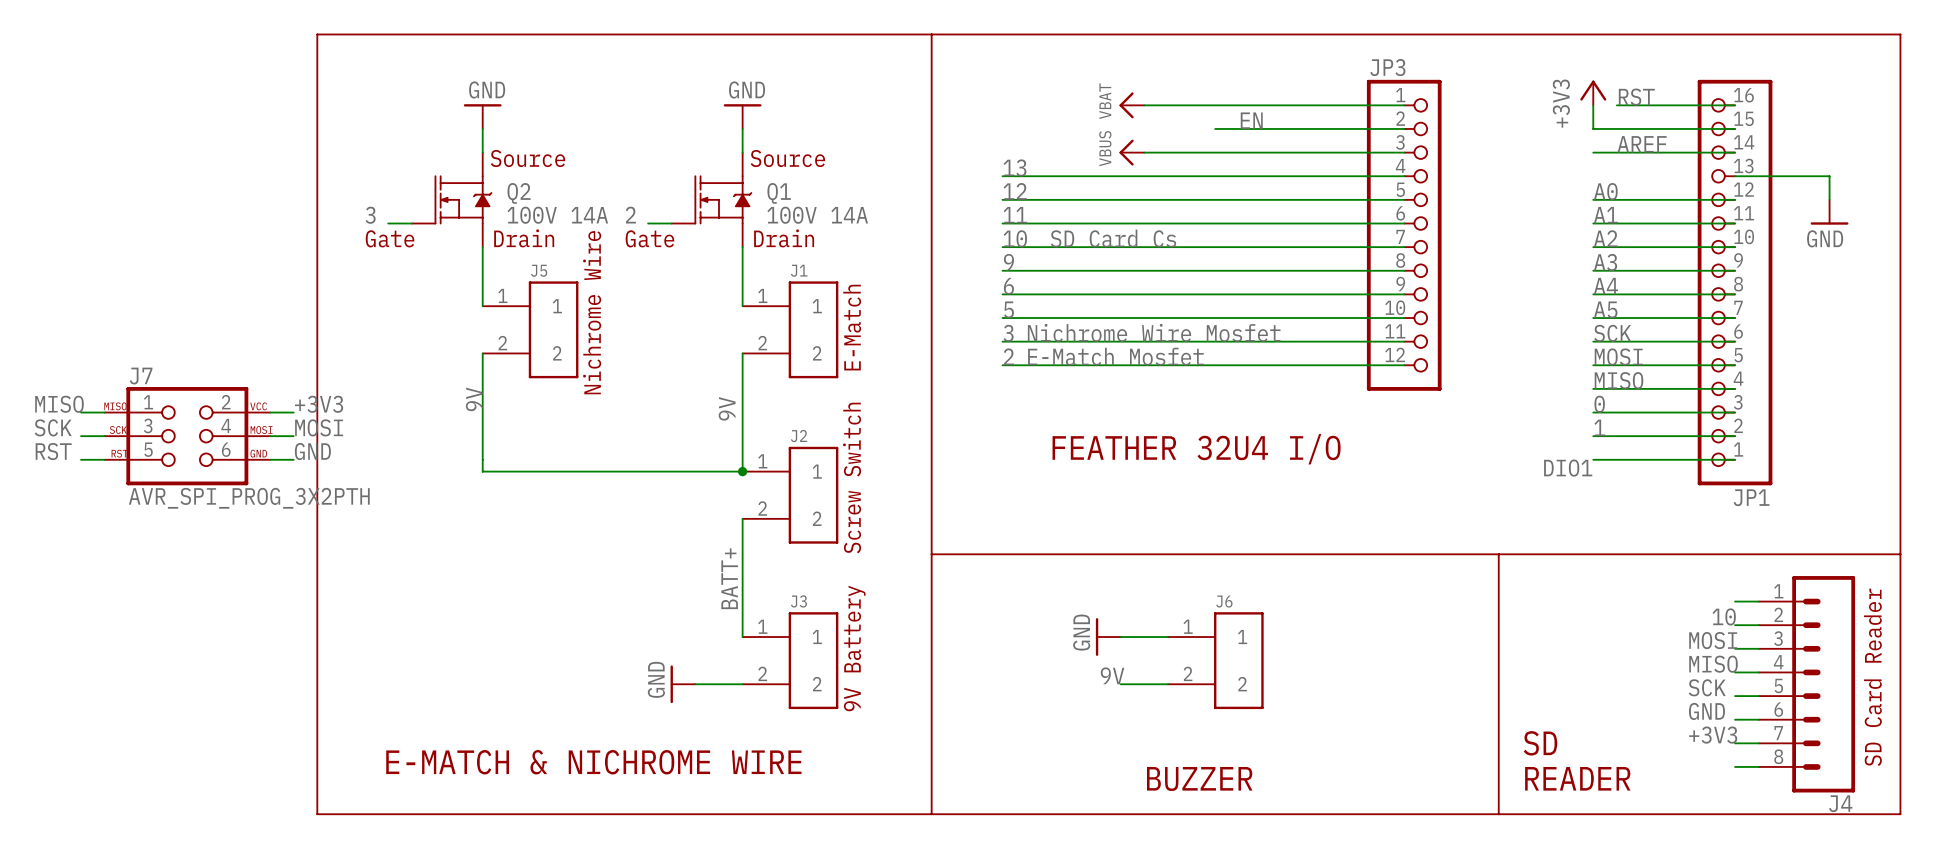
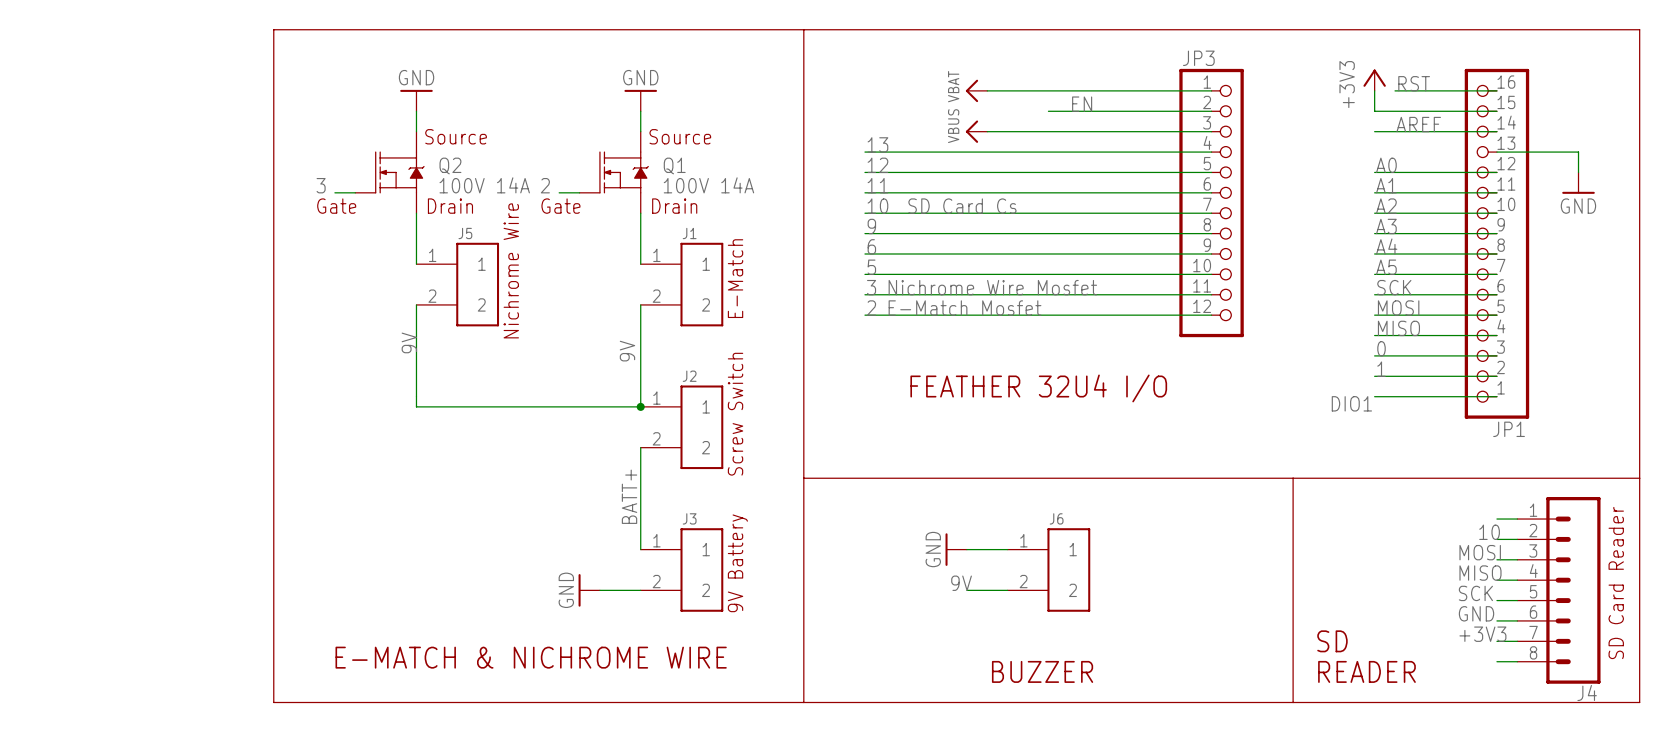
label: MISO (59, 404) -> none
label: +3V3 (319, 404) -> none
wire: (81, 412) (104, 412) -> none
wire: (270, 412) (293, 412) -> none
label: SCK (53, 427) -> none
label: MOSI (319, 427) -> none
wire: (81, 436) (104, 436) -> none
J7: AVR_SPI_PROG_3X2PTH (187, 436) -> none
wire: (270, 436) (293, 436) -> none
label: RST (53, 451) -> none
label: GND (312, 451) -> none
wire: (81, 459) (104, 459) -> none
wire: (270, 459) (293, 459) -> none

